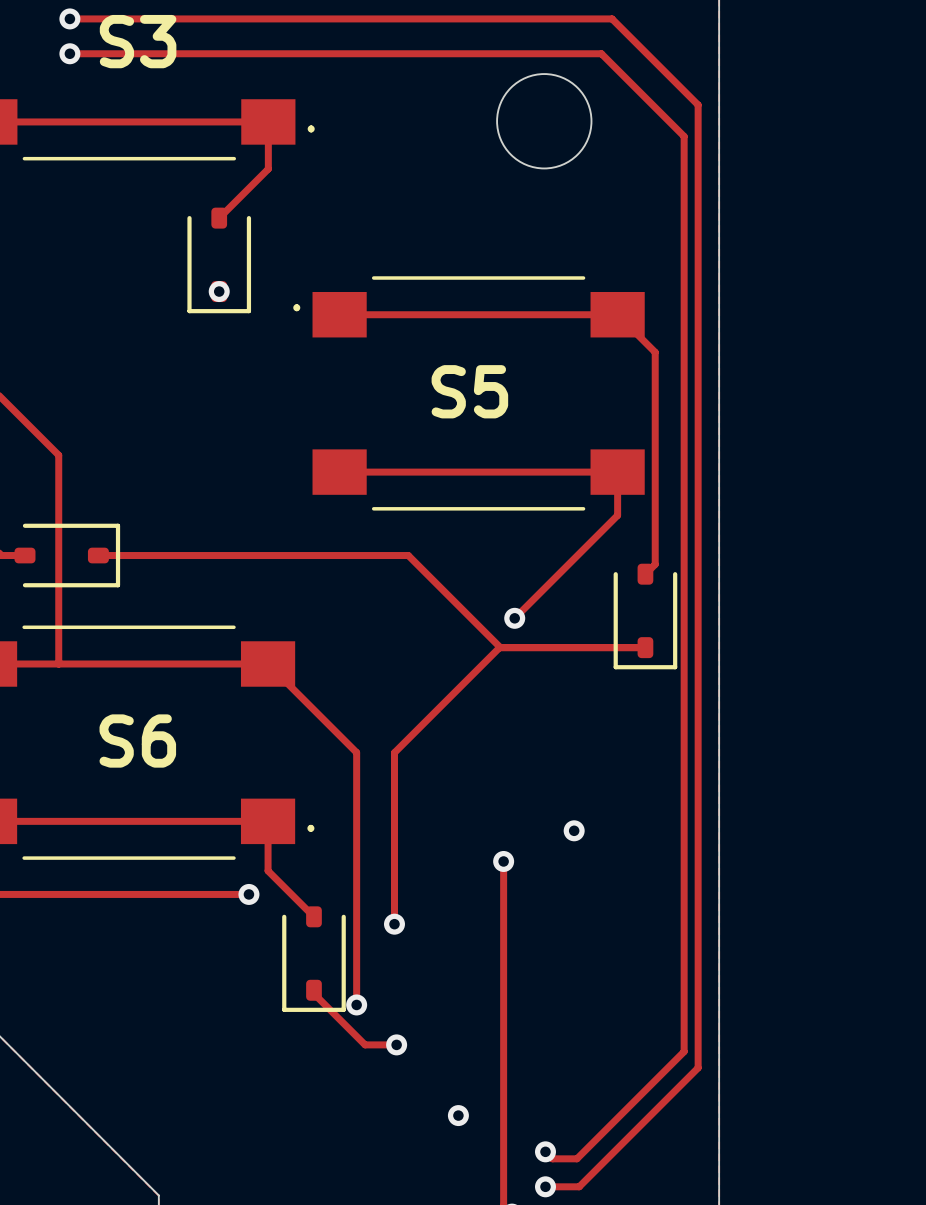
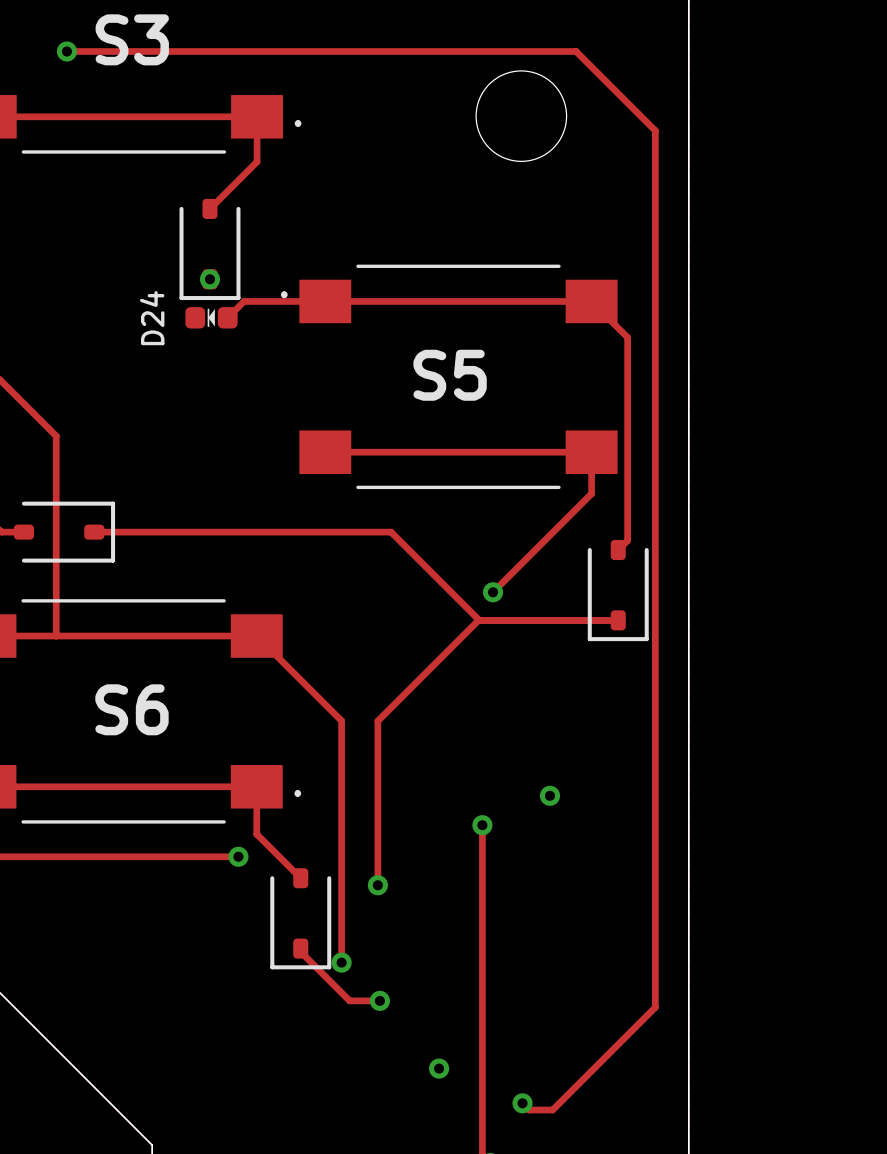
track: (69, 18) (612, 18) (698, 104) (698, 1067) (579, 1186) (545, 1186) -> none
via: (69, 18) -> none
track: none -> (325, 301) (244, 301) (227, 317)
D24: none -> (211, 317)
via: (545, 1186) -> none

